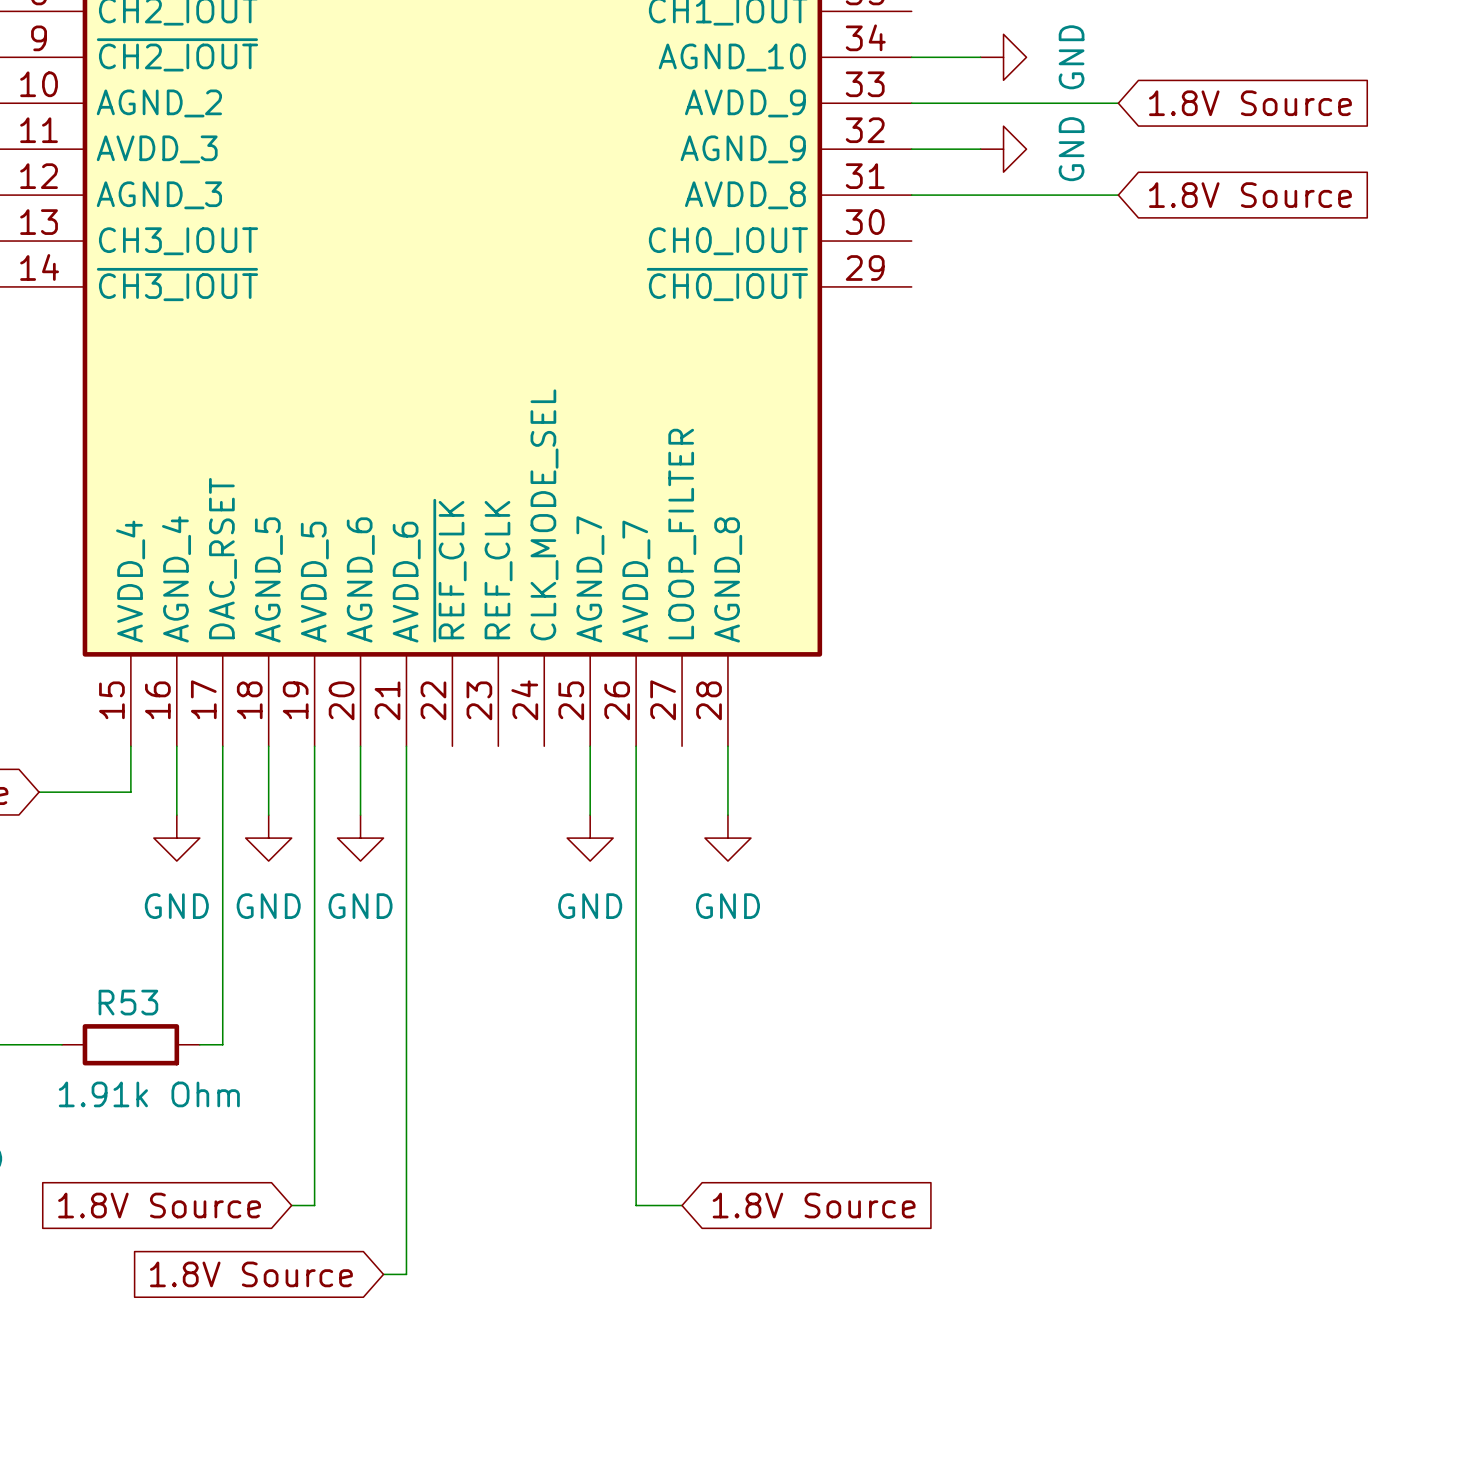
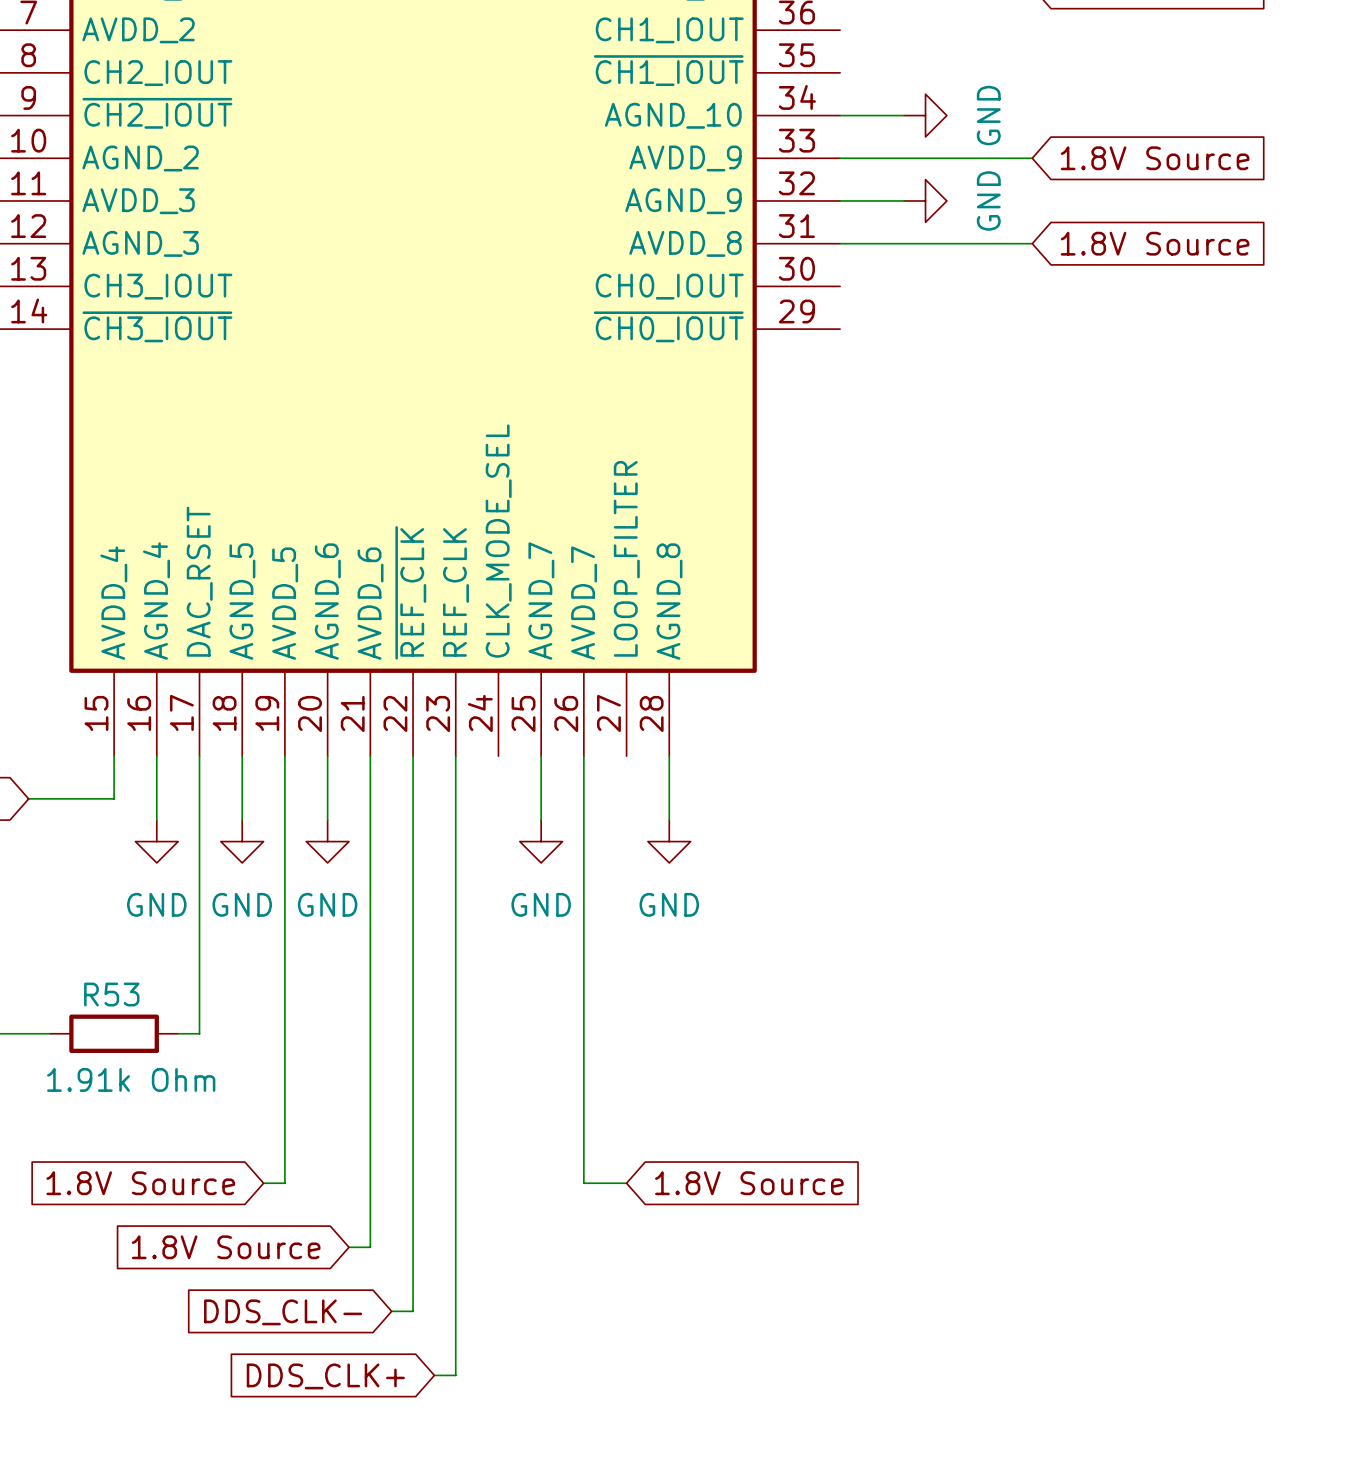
wire: none -> (413, 756) (413, 1311) (391, 1311)
wire: none -> (455, 756) (455, 1375) (434, 1375)
global label: none -> DDS_CLK- (283, 1312)
global label: none -> DDS_CLK+ (325, 1376)

